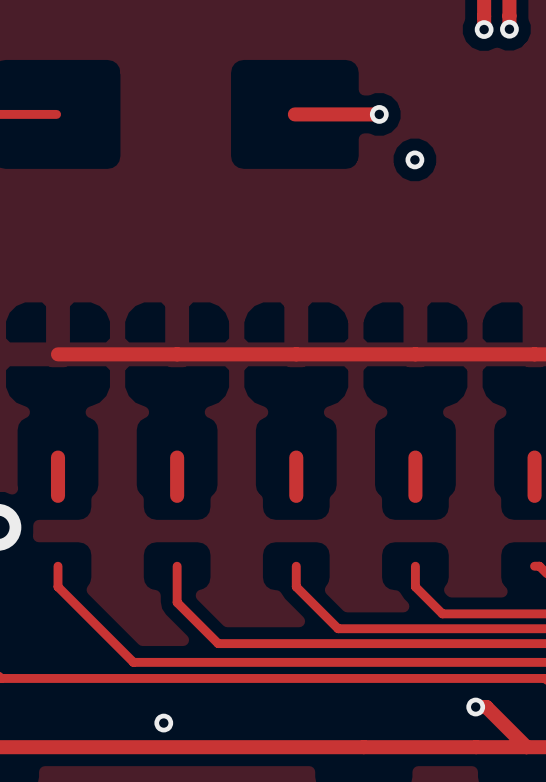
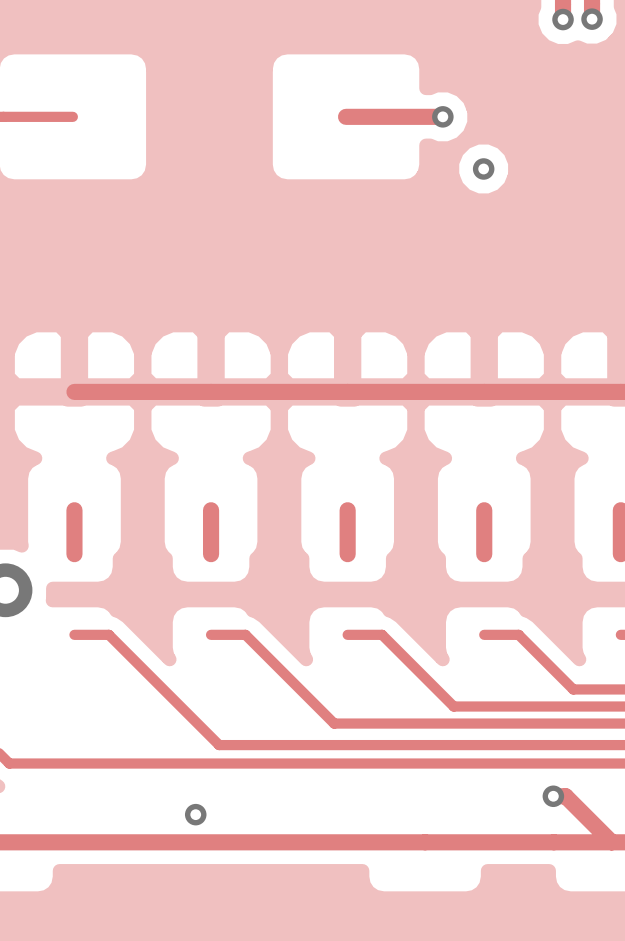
track: (58, 566) (58, 586) (133, 662) (184, 662) -> (74, 634) (108, 634) (219, 745)
track: (177, 566) (177, 602) (218, 643) (284, 643) -> (211, 634) (245, 634) (334, 723)
track: (296, 566) (296, 586) (338, 628) (388, 628) -> (347, 634) (382, 634) (453, 706)
track: (415, 566) (415, 586) (442, 613) (493, 613) -> (484, 634) (518, 634) (573, 689)

